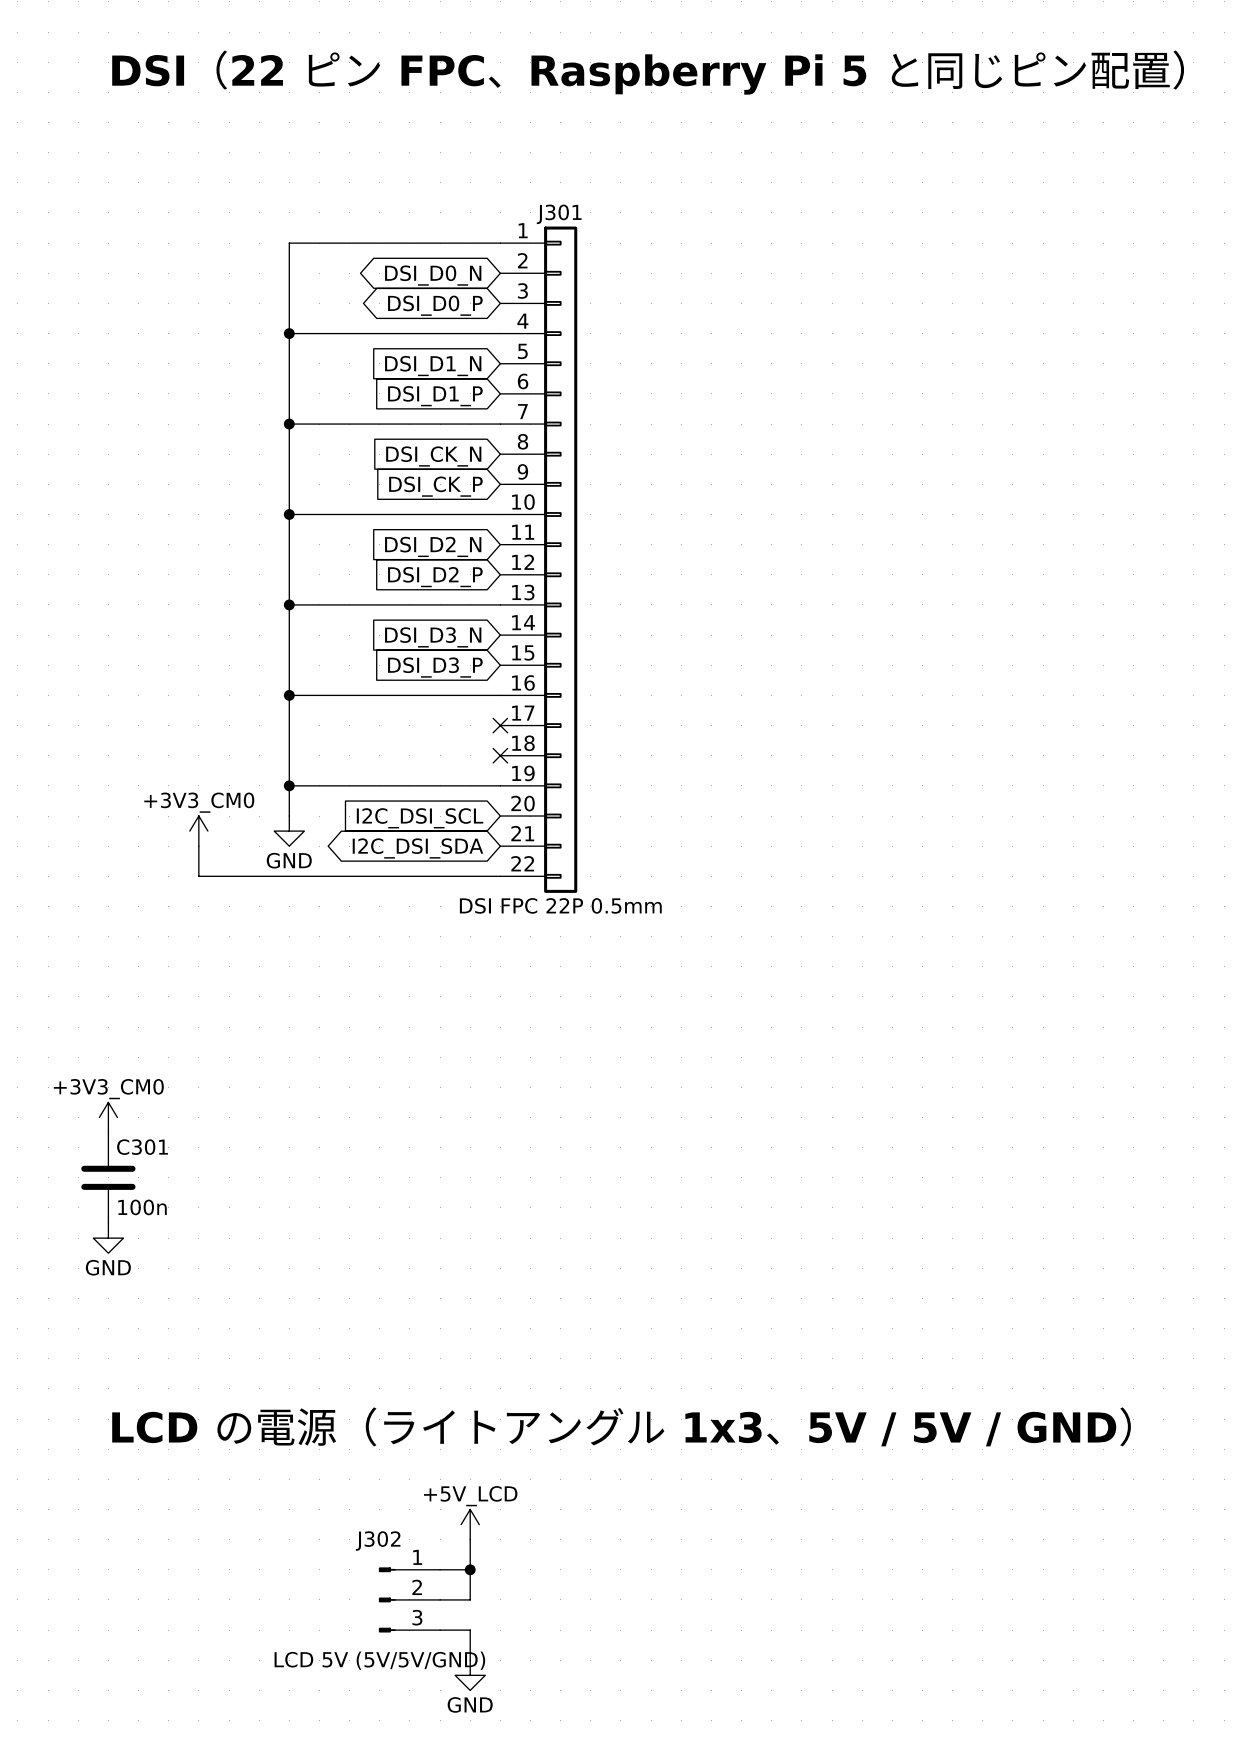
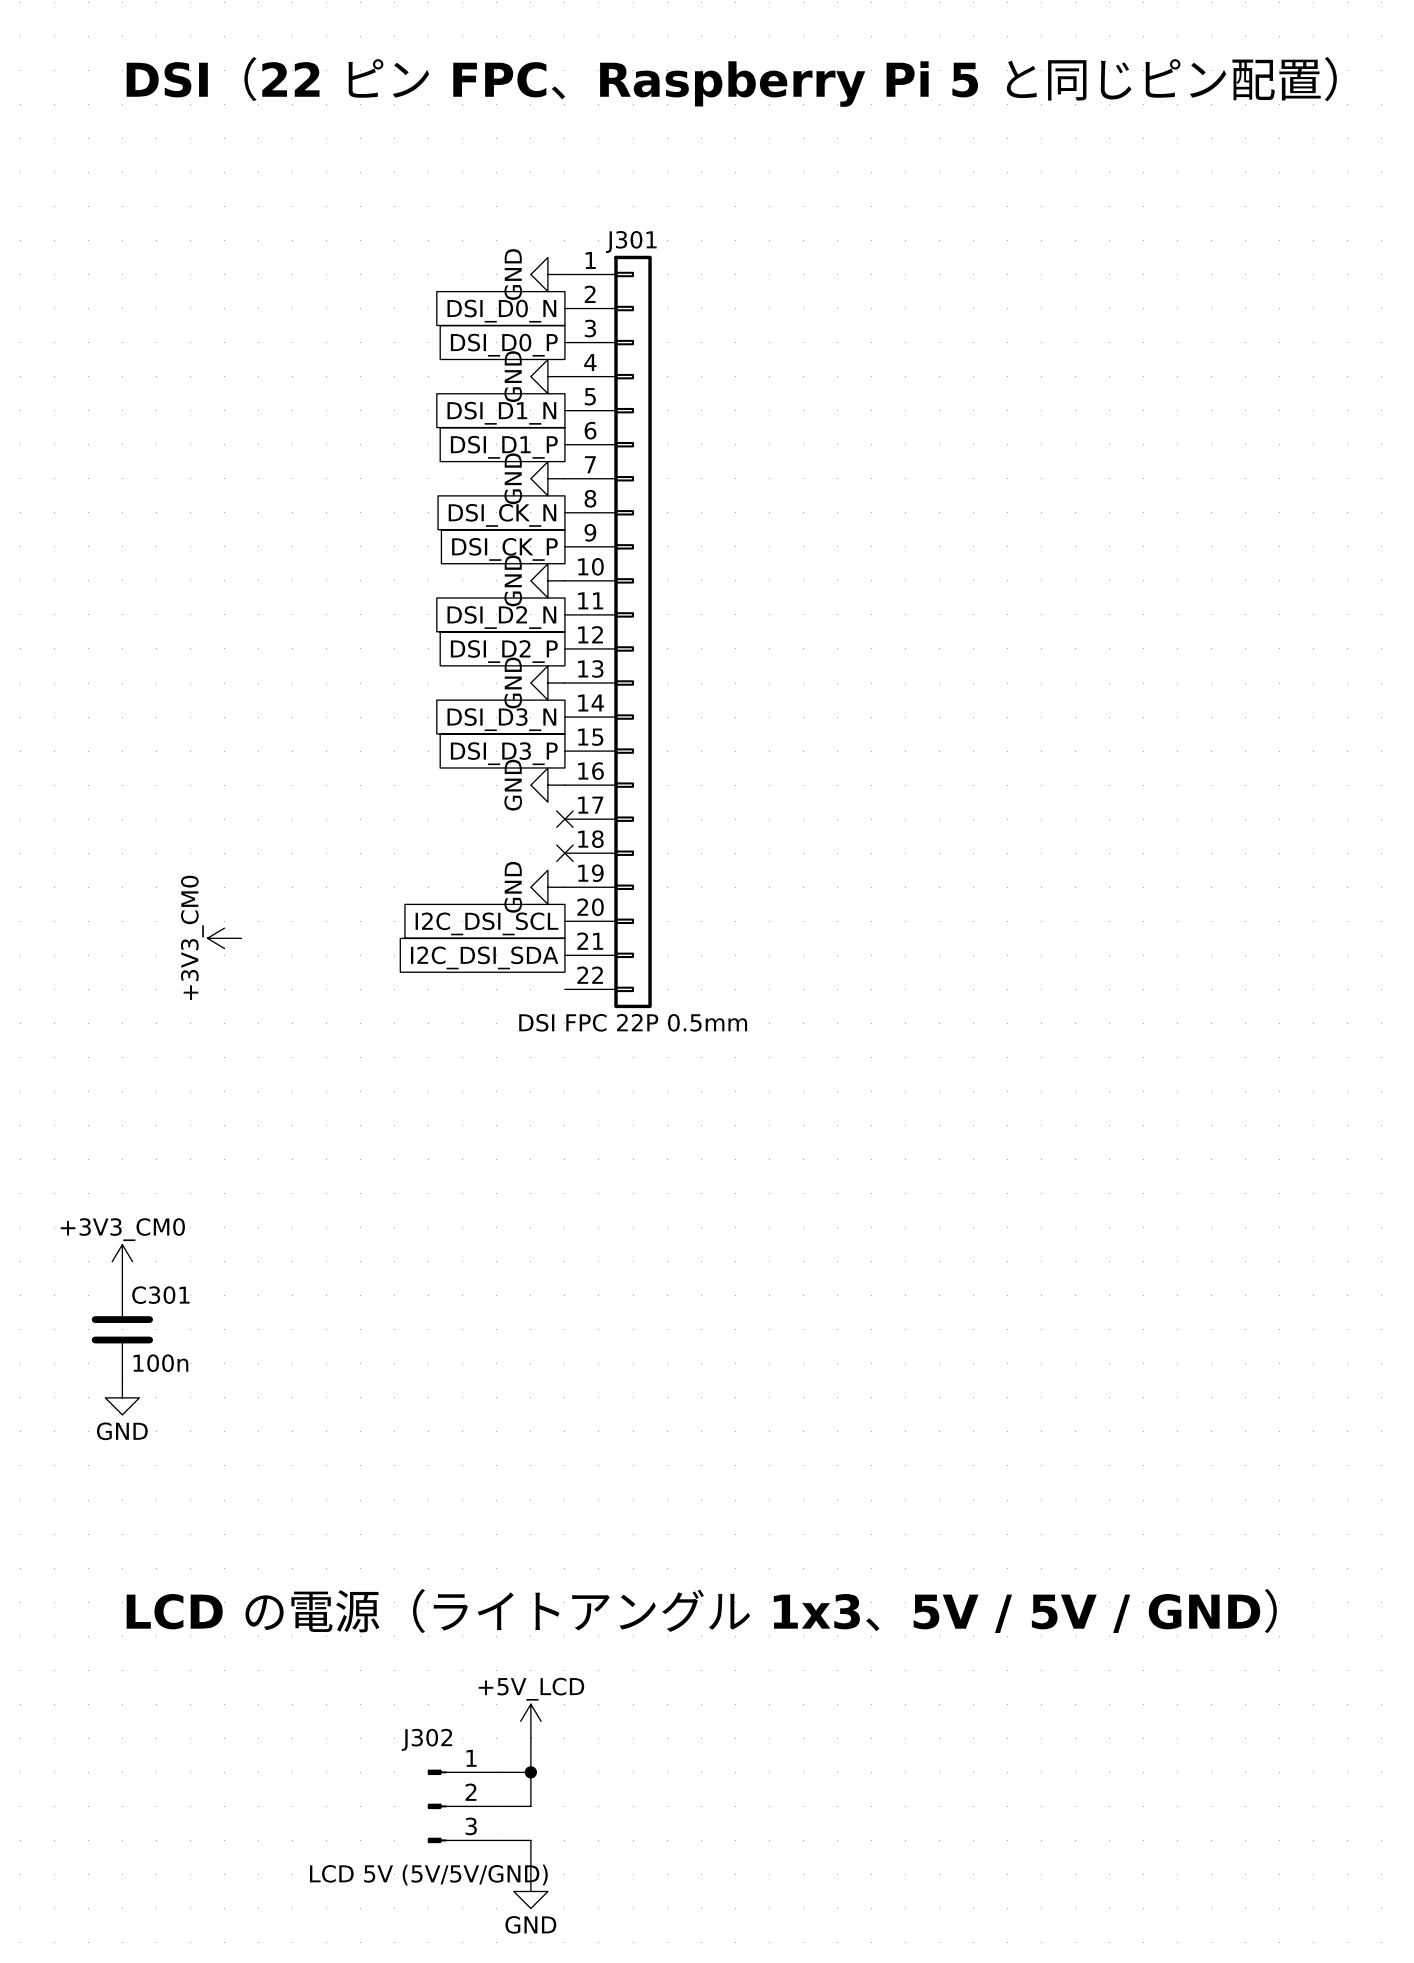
power symbol: none -> GND (547, 274)
wire: (500, 243) (289, 243) (289, 816) -> none
global label shape: bidirectional (433, 275) -> passive (501, 311)
global label shape: bidirectional (435, 305) -> passive (504, 345)
wire: (289, 333) (500, 333) -> none
junction: (289, 333) -> none
power symbol: none -> GND (547, 376)
global label shape: input (433, 366) -> passive (501, 413)
global label shape: input (435, 396) -> passive (504, 447)
wire: (289, 424) (500, 424) -> none
junction: (289, 424) -> none
power symbol: none -> GND (547, 478)
global label shape: input (433, 456) -> passive (502, 515)
global label shape: input (435, 486) -> passive (504, 549)
wire: (289, 514) (500, 514) -> none
junction: (289, 514) -> none
power symbol: none -> GND (547, 580)
global label shape: input (433, 546) -> passive (501, 617)
global label shape: input (435, 577) -> passive (504, 651)
wire: (289, 604) (500, 604) -> none
junction: (289, 604) -> none
power symbol: none -> GND (547, 683)
global label shape: input (433, 637) -> passive (501, 719)
global label shape: input (435, 667) -> passive (504, 753)
wire: (289, 695) (500, 695) -> none
junction: (289, 695) -> none
power symbol: none -> GND (547, 785)
wire: (289, 785) (500, 785) -> none
junction: (289, 785) -> none
power symbol: none -> GND (547, 887)
global label shape: input (420, 818) -> passive (487, 923)
power symbol rotation: 0° (198, 831) -> 90° counterclockwise (224, 938)
power symbol: GND (289, 831) -> none
wire: (198, 846) (198, 876) (500, 876) -> none
global label shape: bidirectional (417, 848) -> passive (484, 957)

